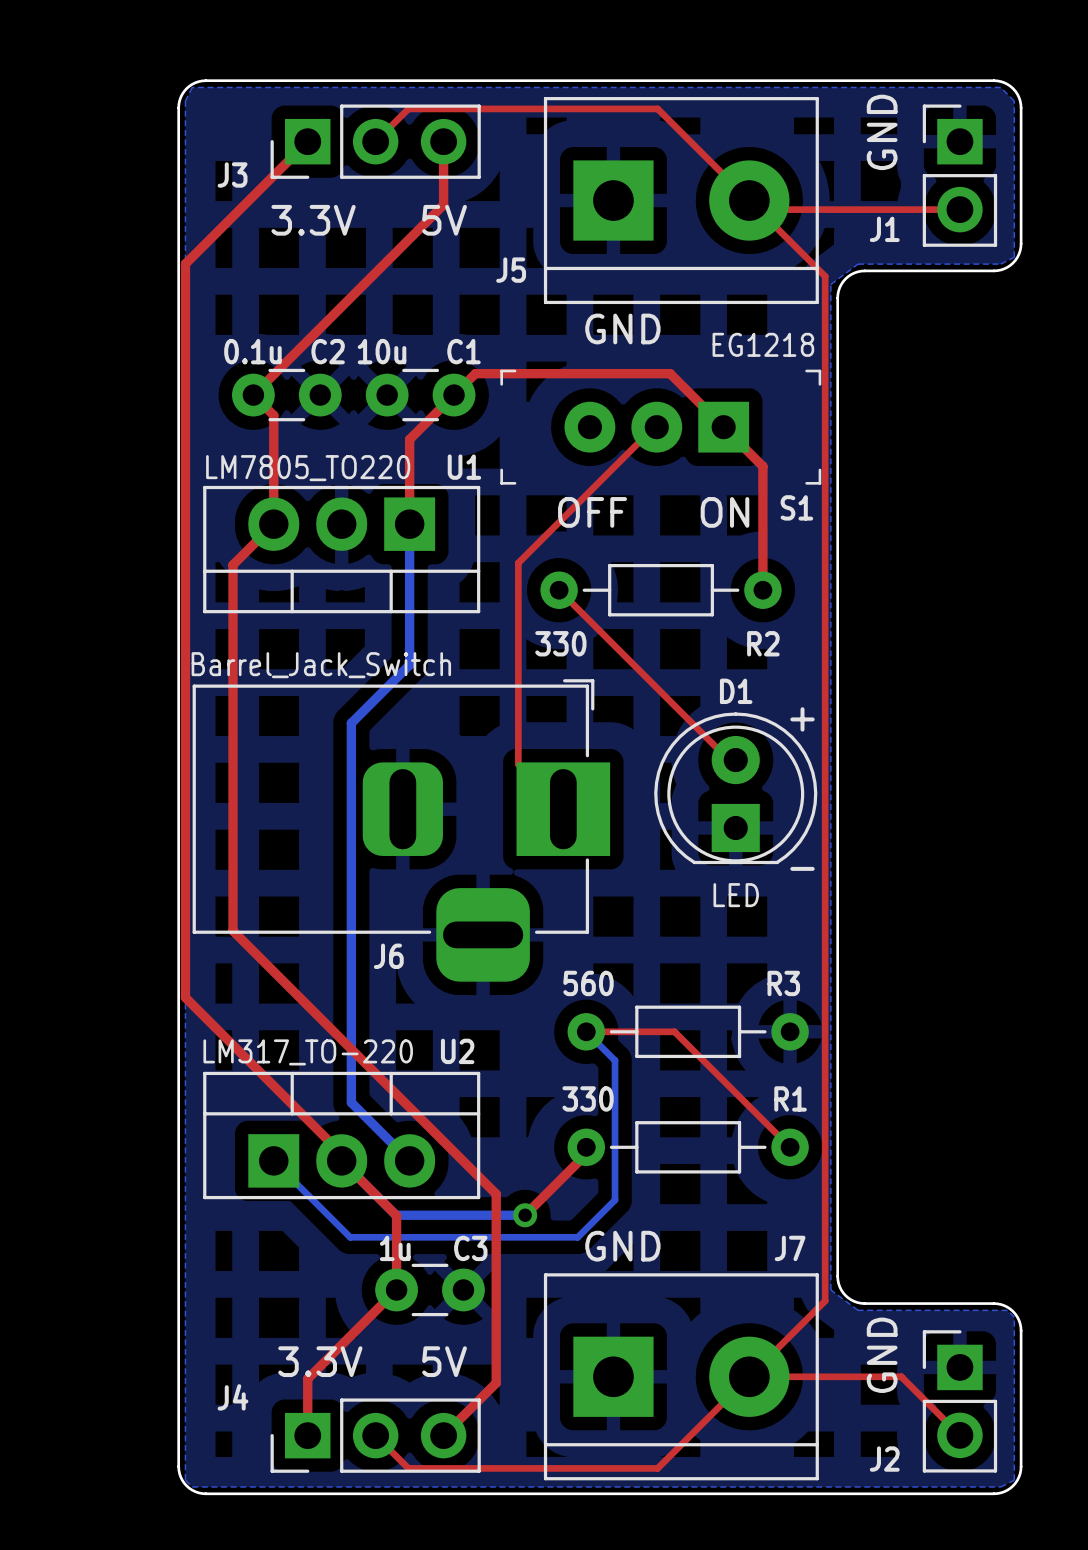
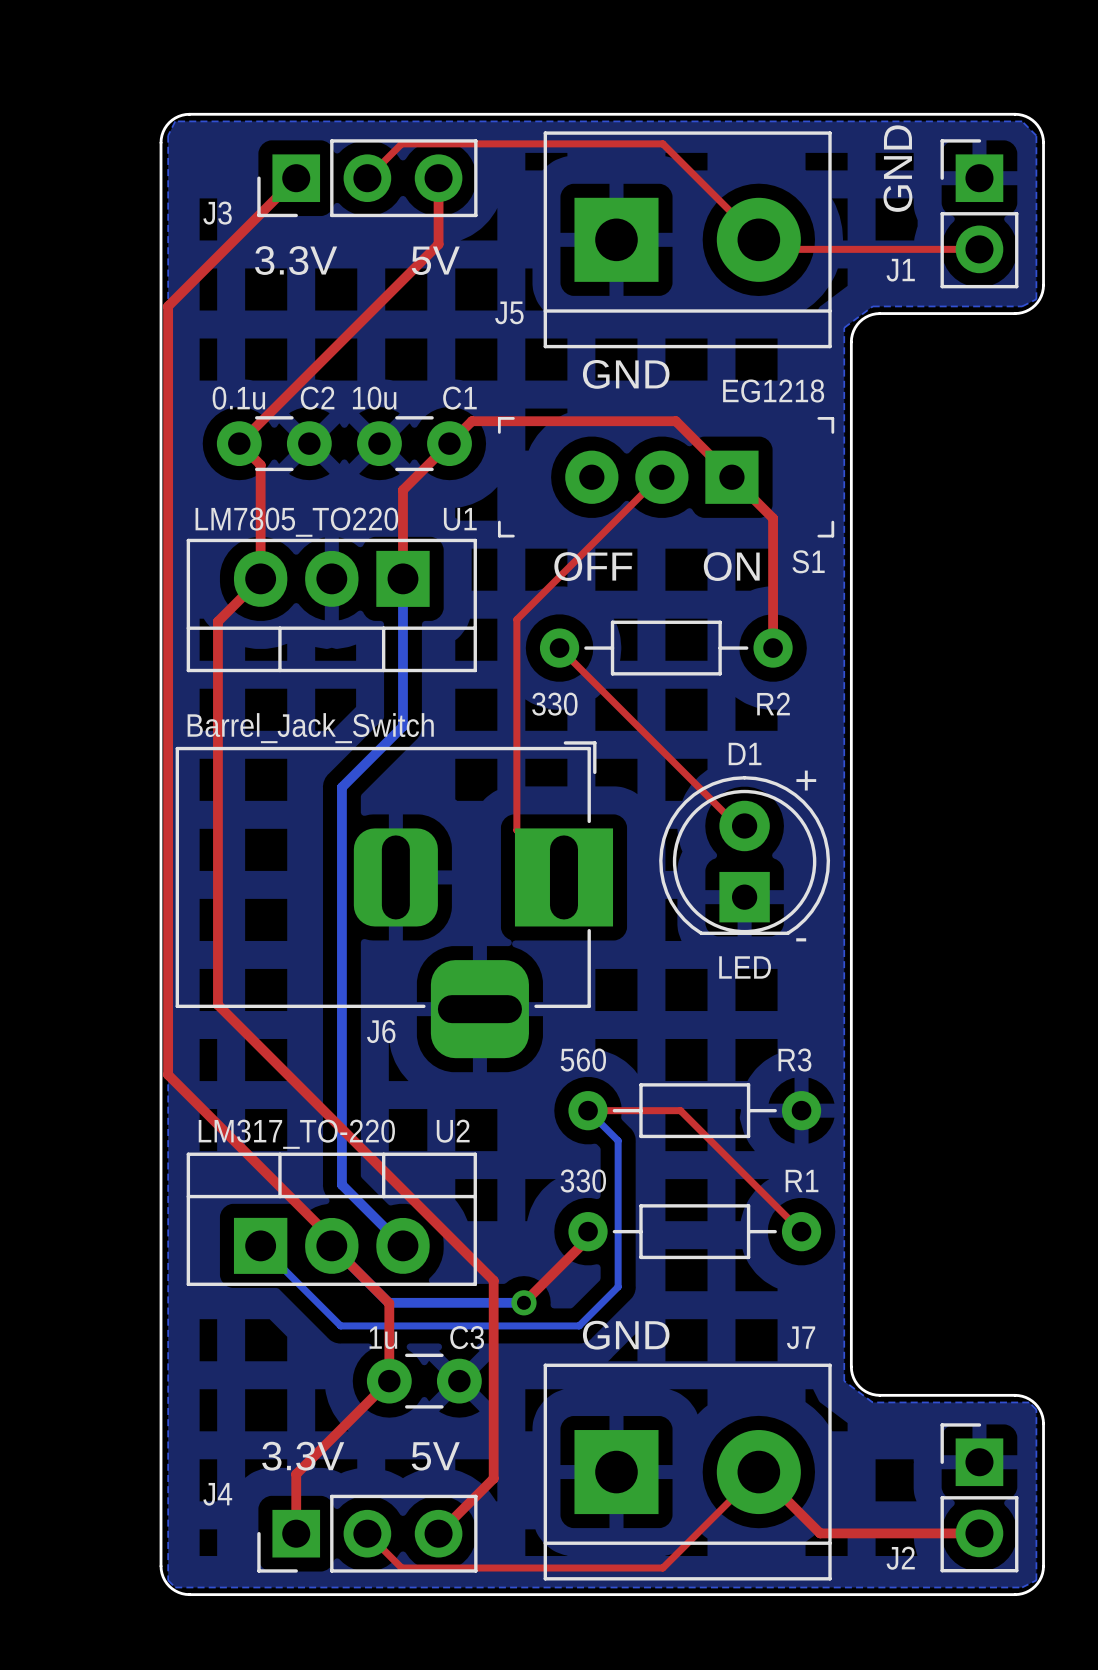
top track: (758, 209) (825, 276) (825, 1300) (749, 1376) (901, 1376) (959, 1435) -> (758, 1472) (820, 1533) (979, 1533)
text: GND (882, 1355) -> none

